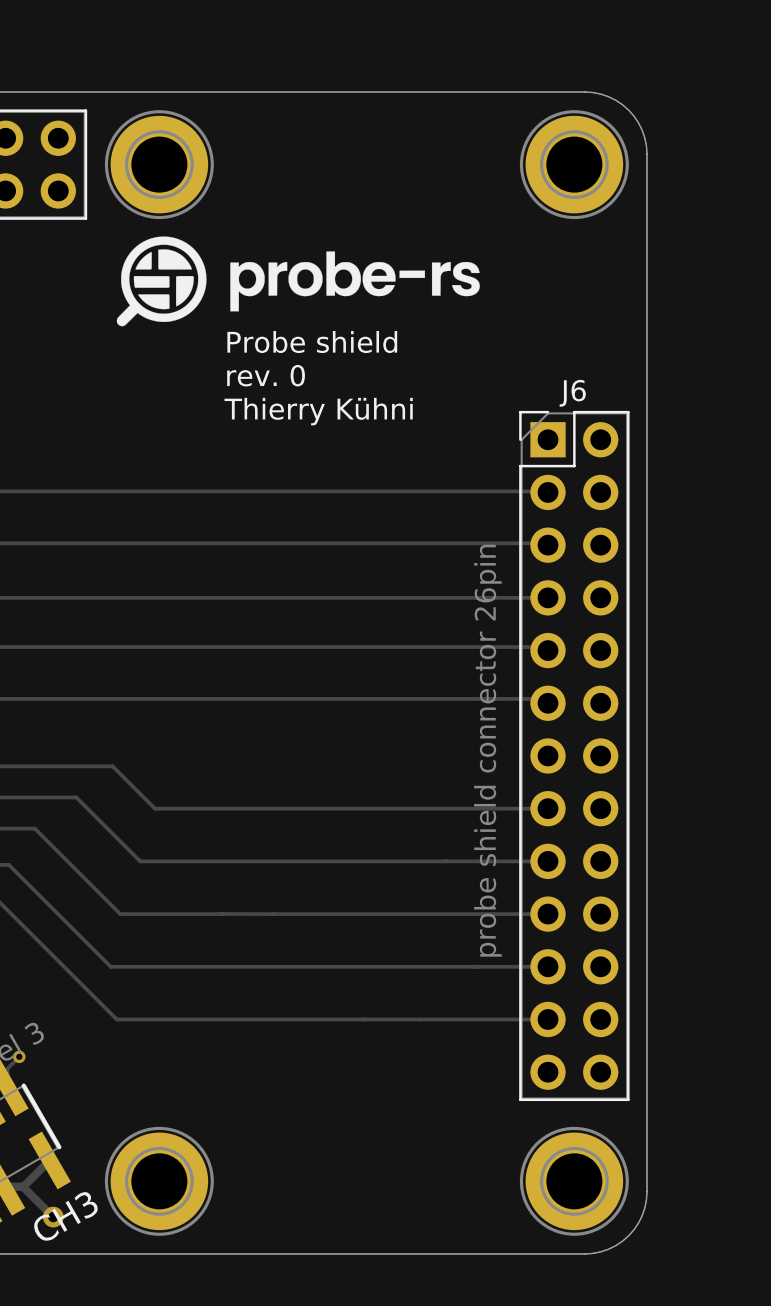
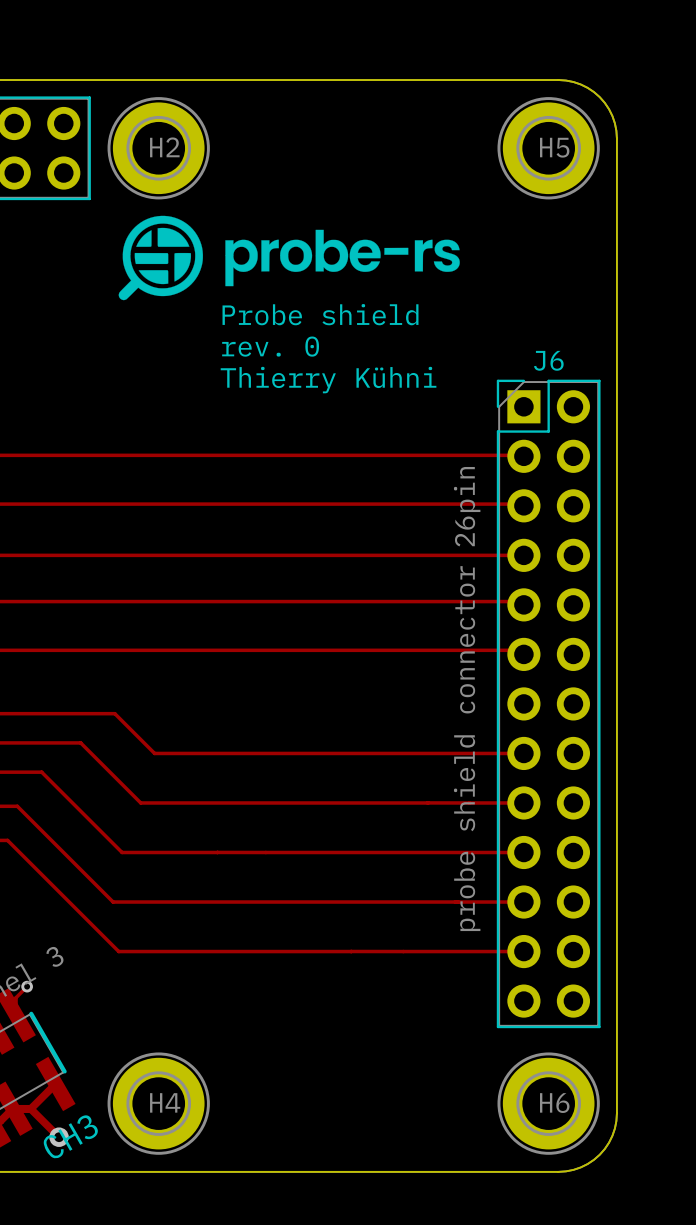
H2 name: none -> H2 (164, 147)
H5 name: none -> H5 (554, 147)
H4 name: none -> H4 (165, 1102)
H6 name: none -> H6 (554, 1103)

